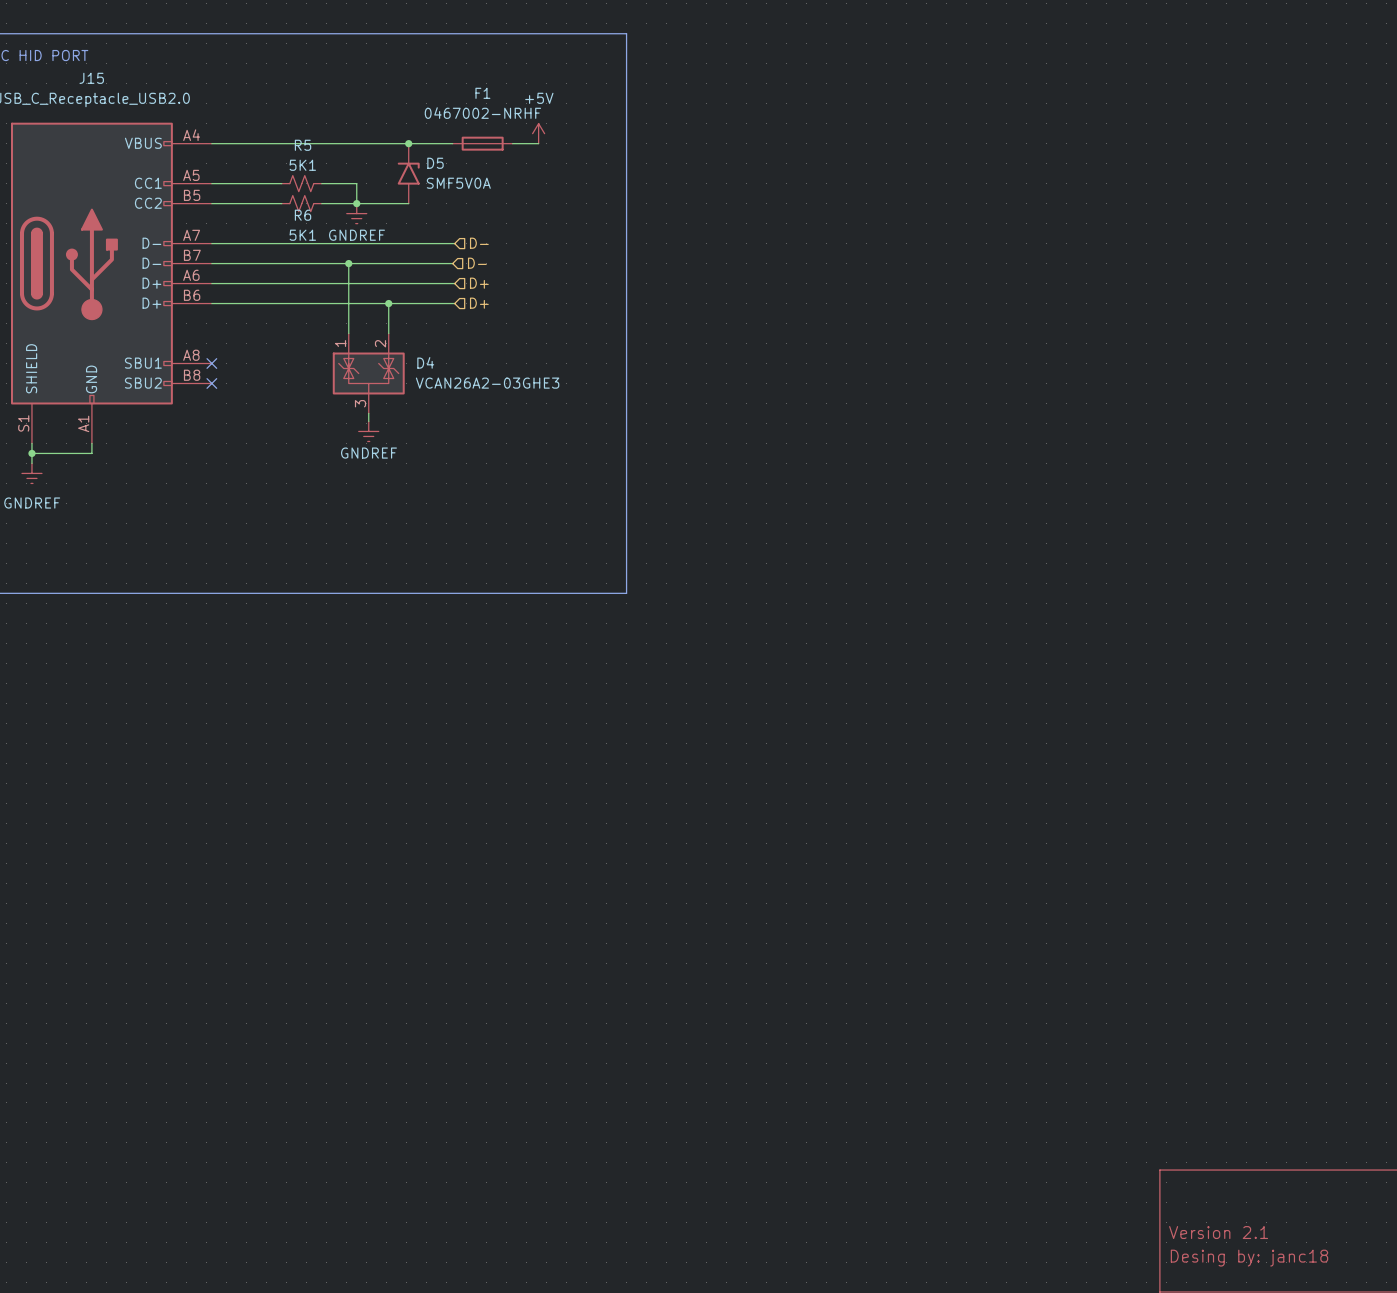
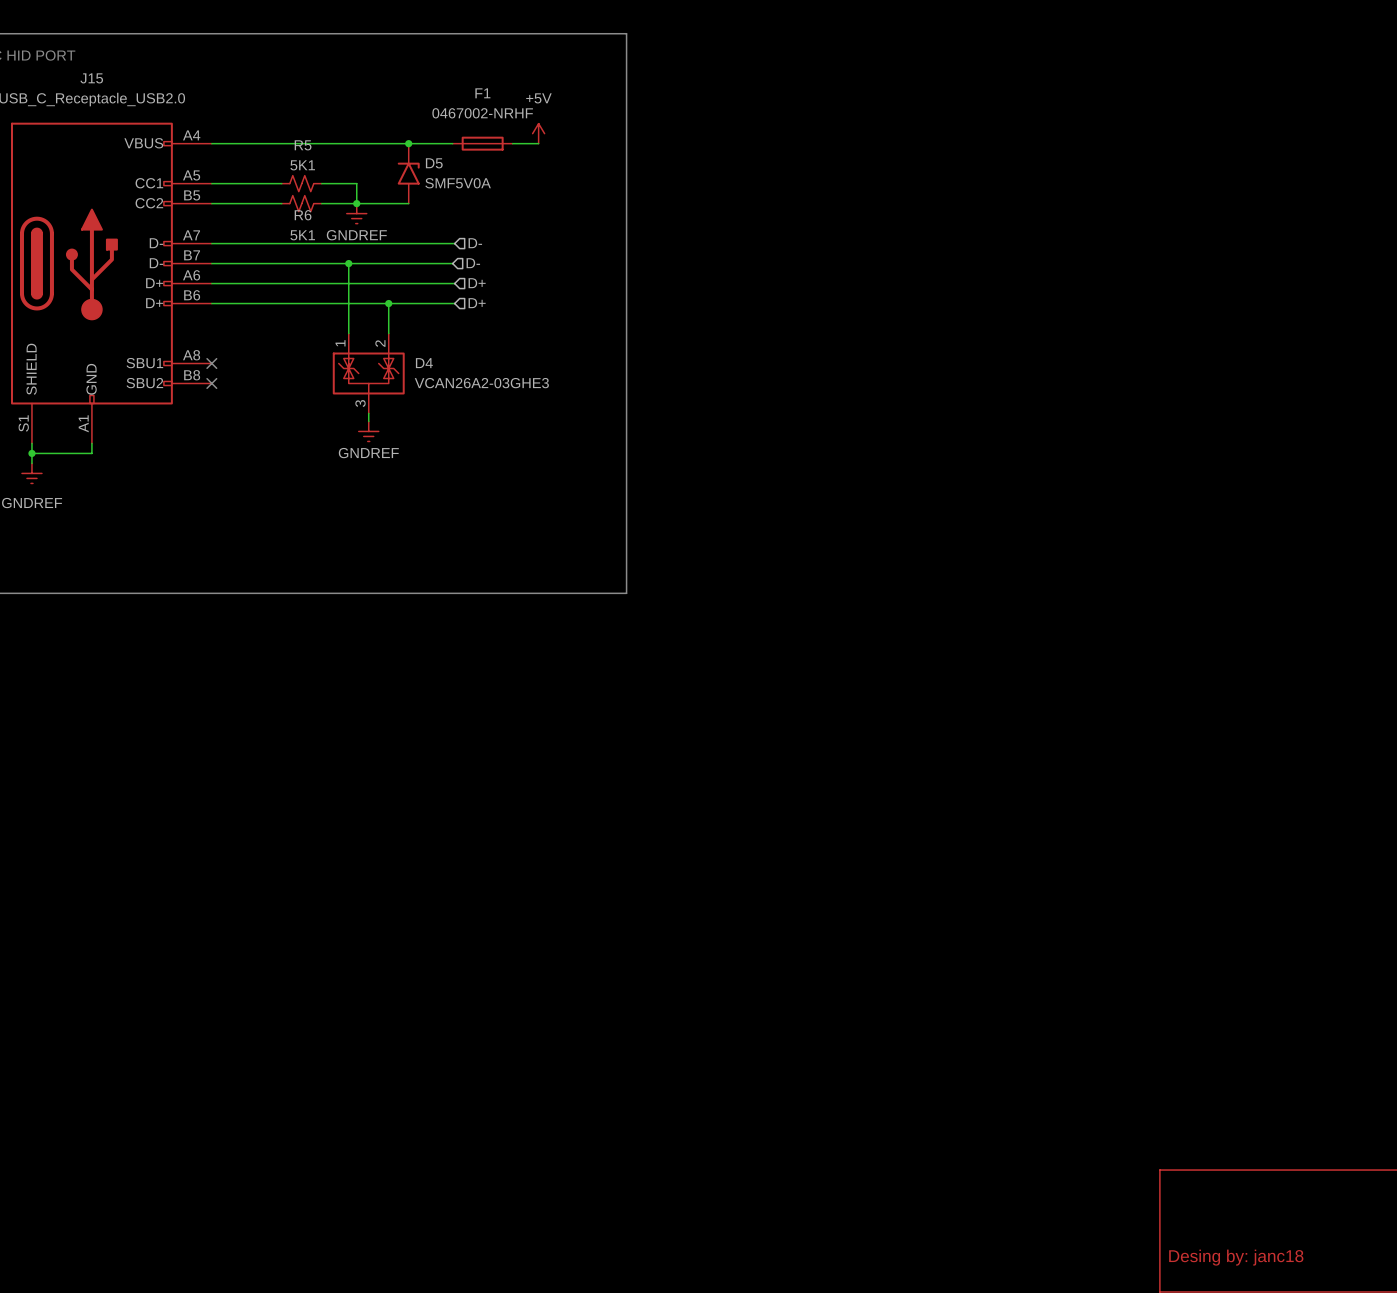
title block: Version 2.1 (1218, 1232) -> none

